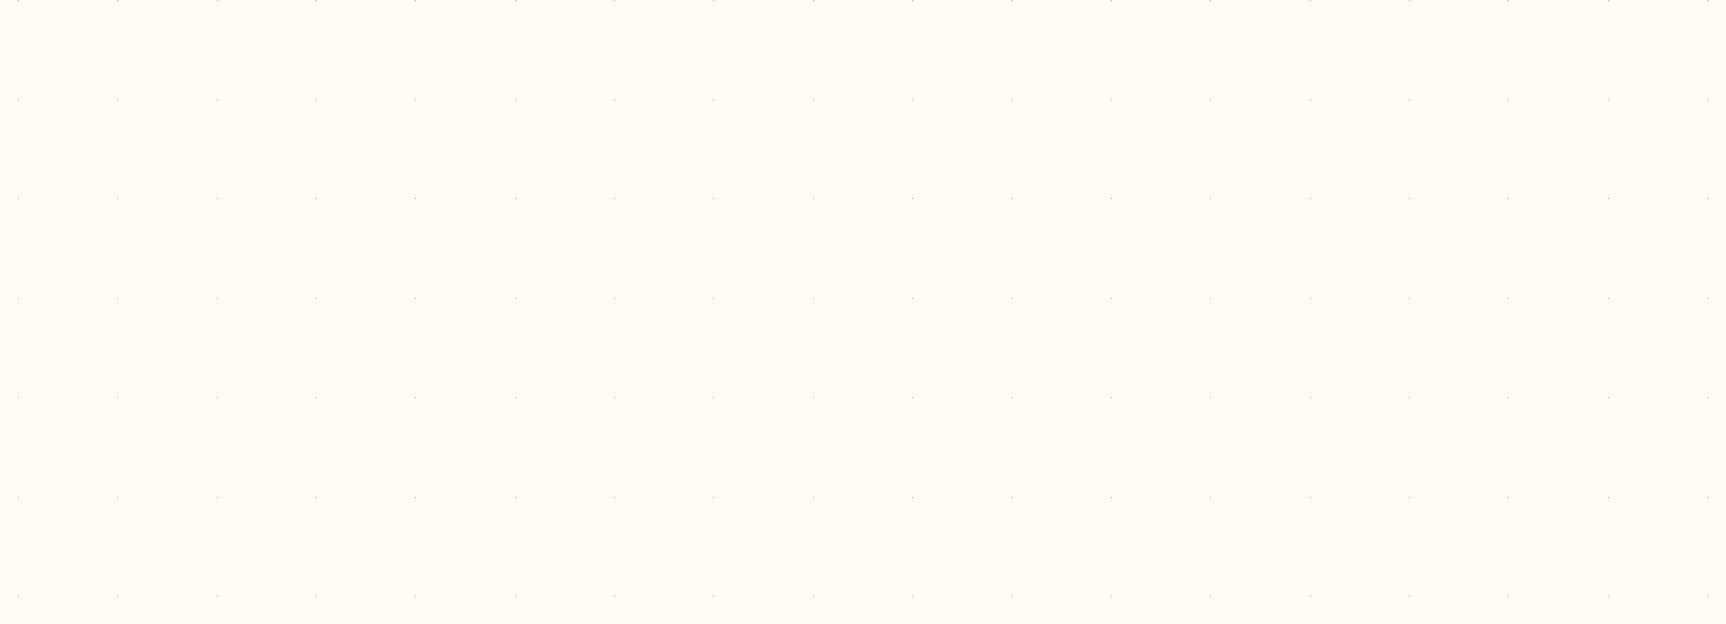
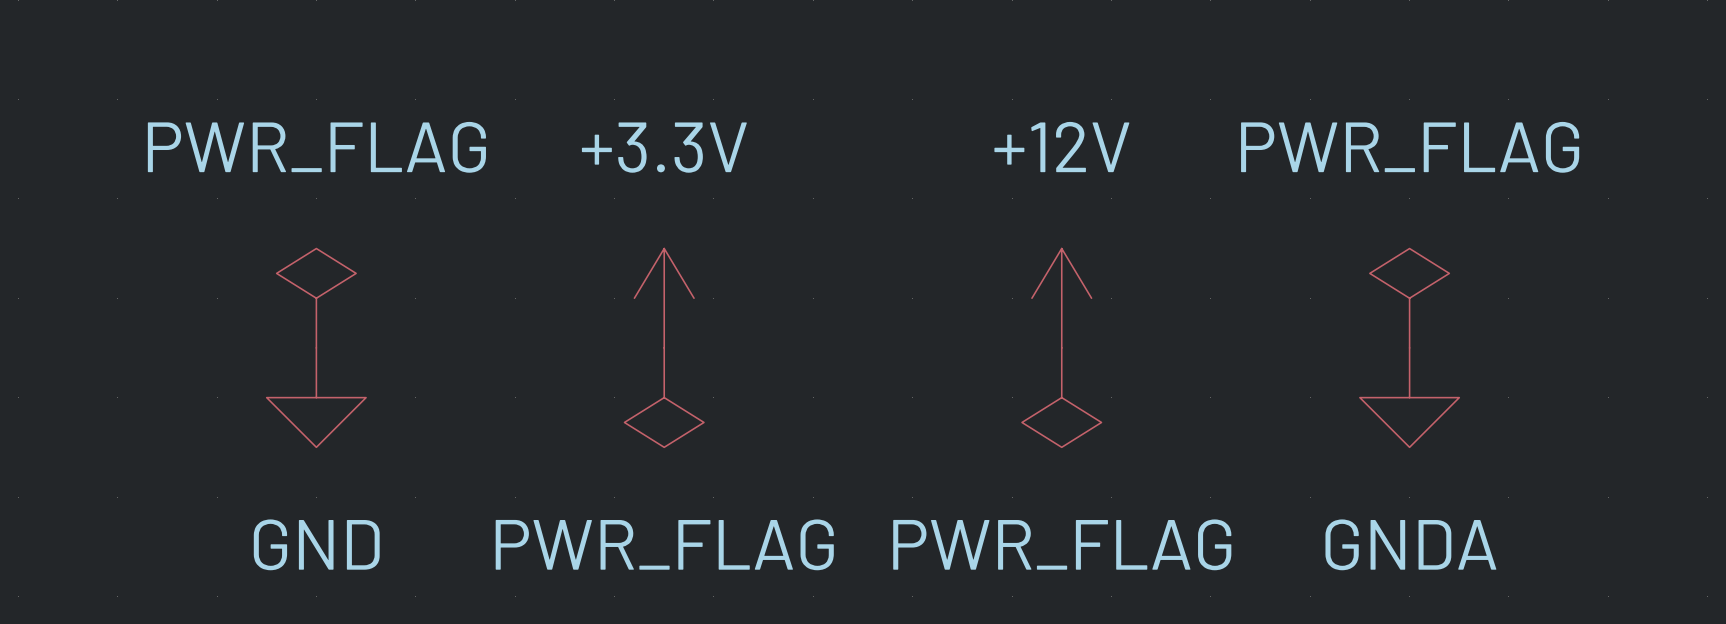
power symbol: none -> PWR_FLAG (316, 298)
power symbol: none -> +3.3V (664, 298)
power symbol: none -> +12V (1061, 298)
power symbol: none -> PWR_FLAG (1409, 298)
power symbol: none -> GND (316, 397)
power symbol: none -> PWR_FLAG (664, 397)
power symbol: none -> PWR_FLAG (1061, 397)
power symbol: none -> GNDA (1409, 397)

